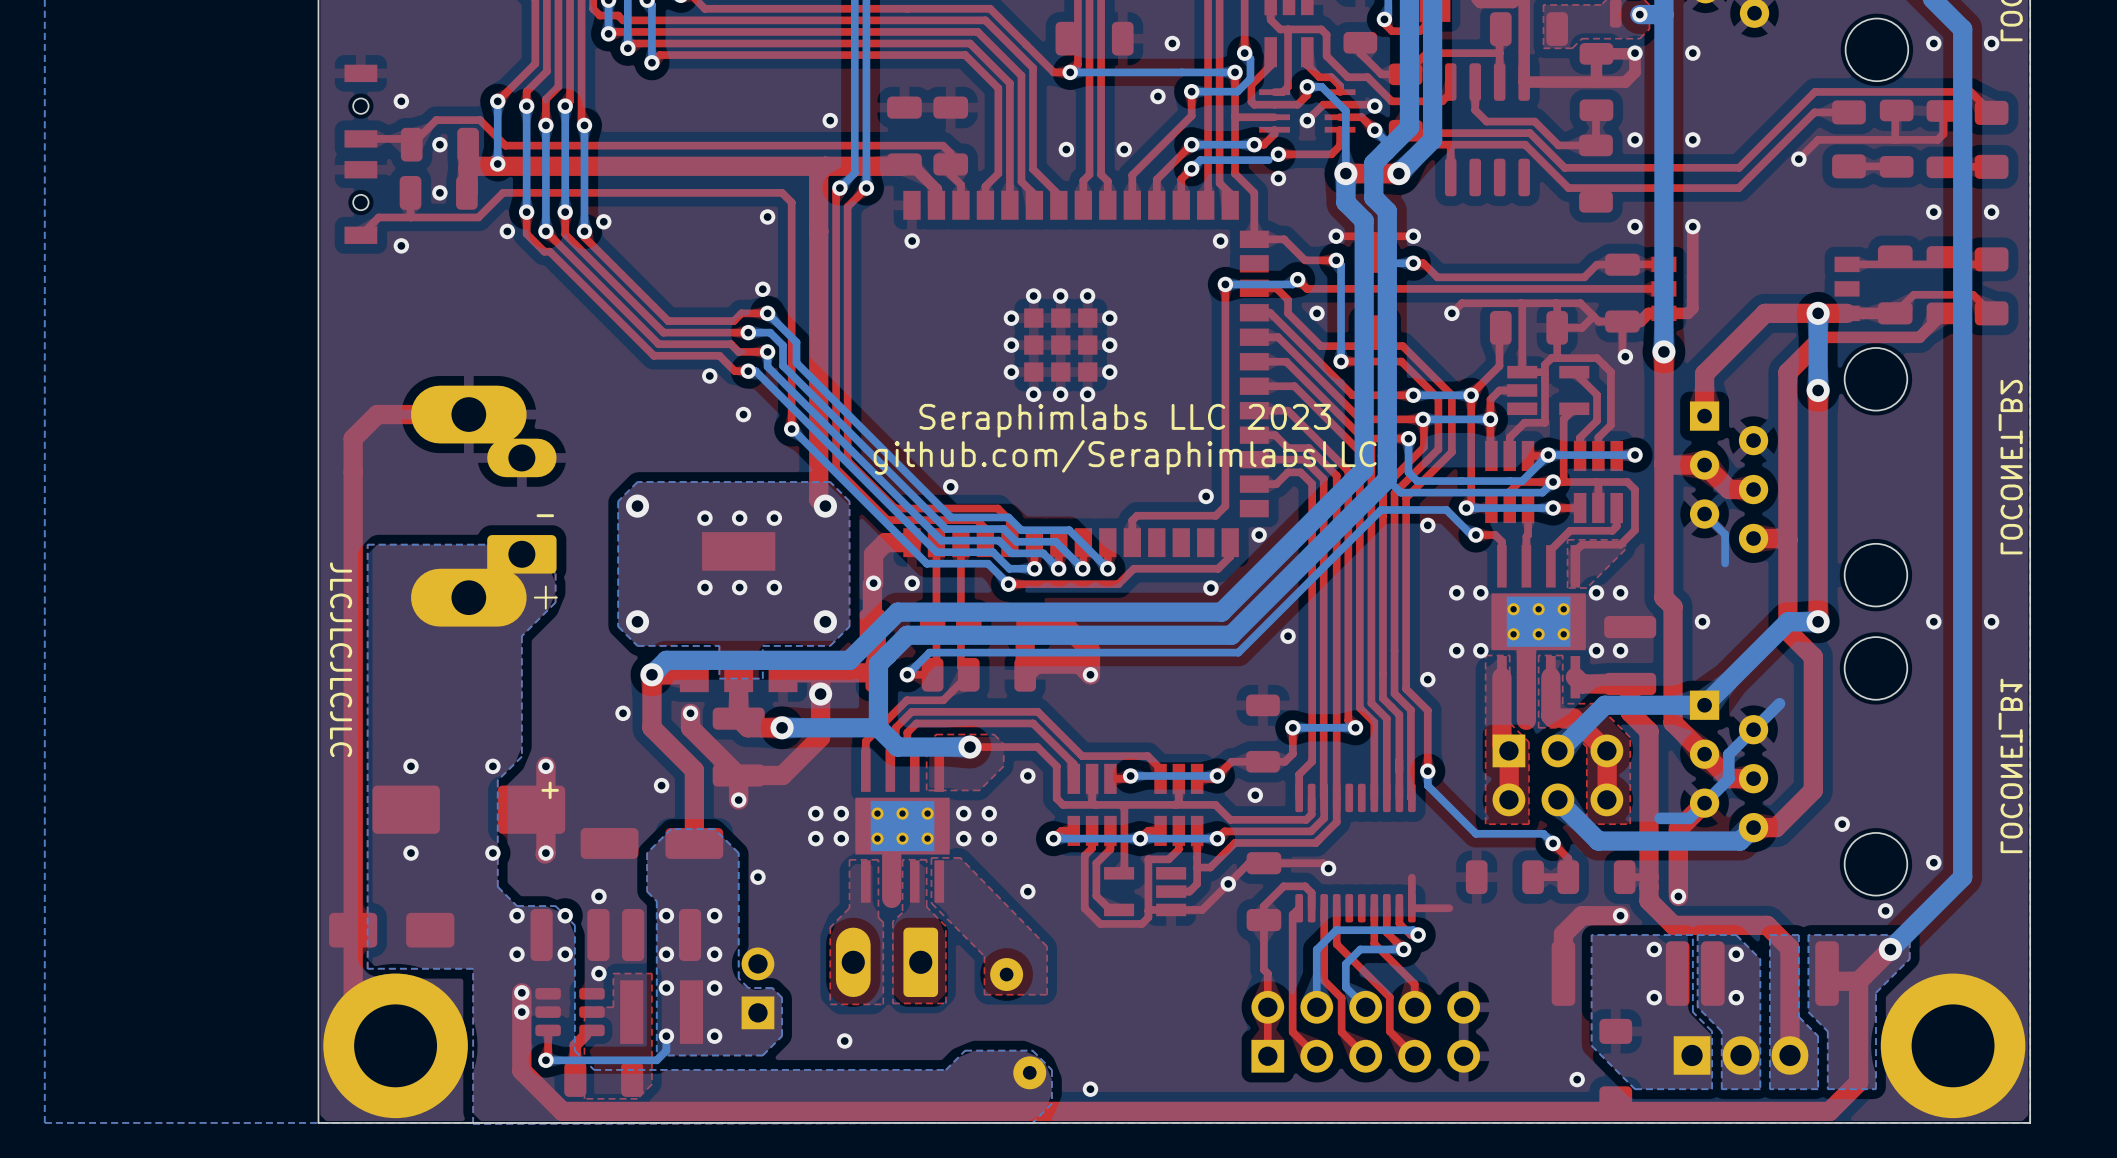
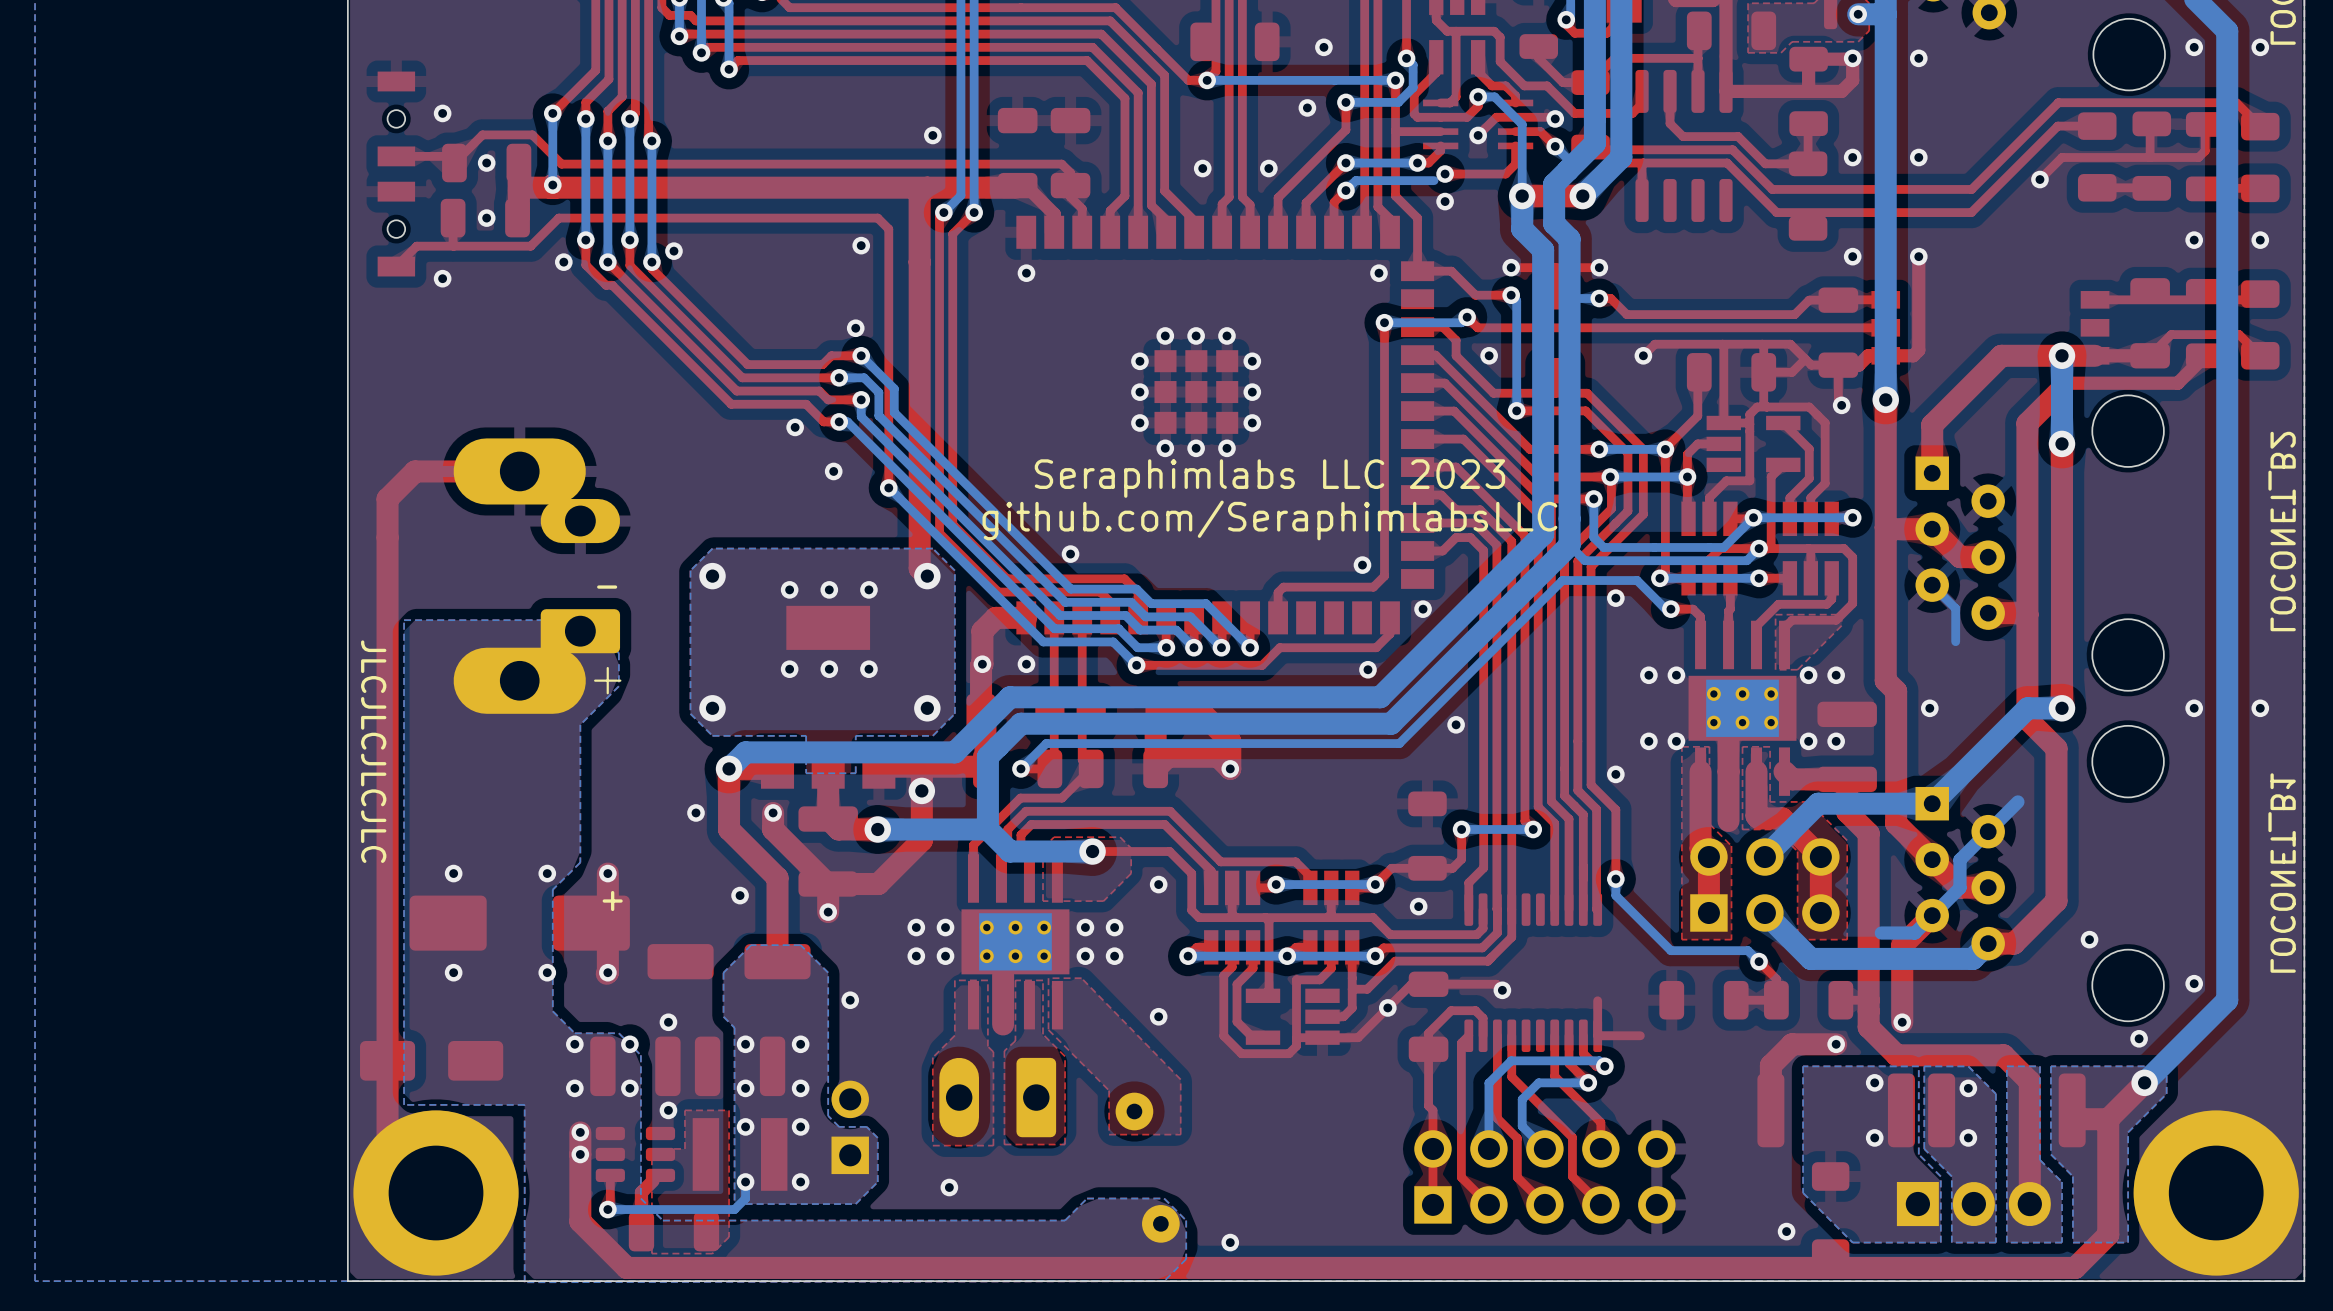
part footprint: [1492, 734, 1624, 817] -> [1690, 838, 1840, 932]

